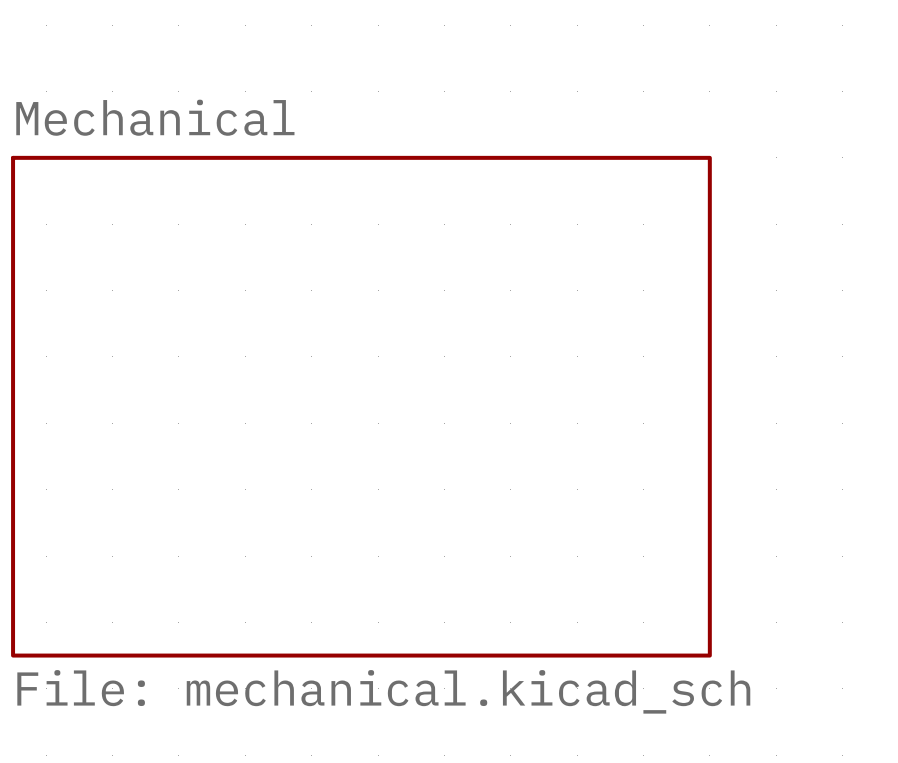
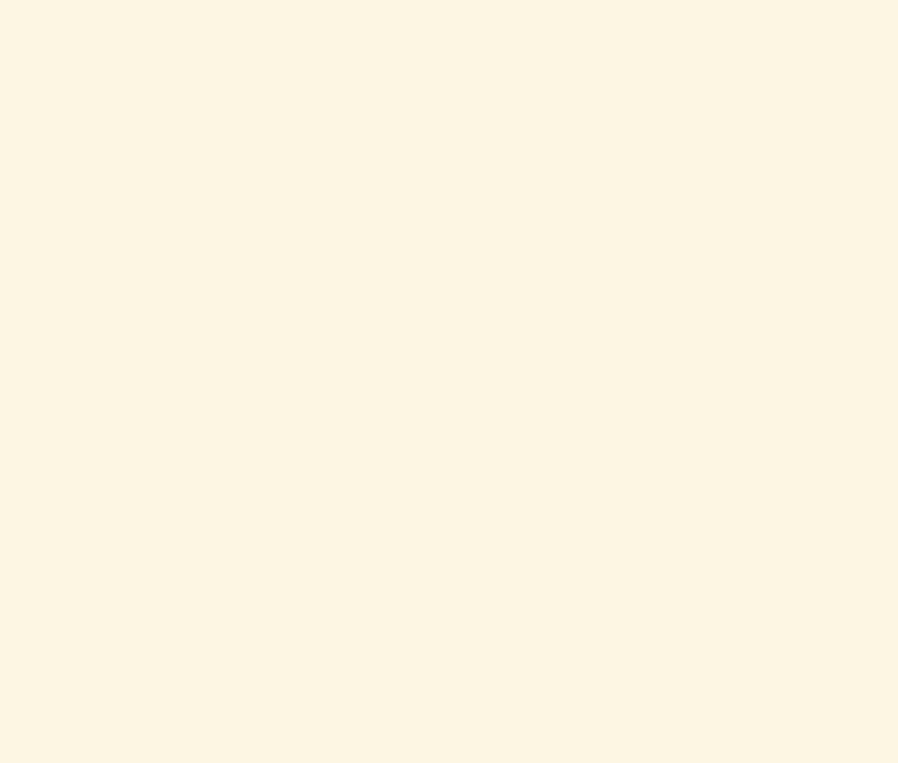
sheet Mechanical: File: mechanical.kicad_sch (361, 406) -> none

